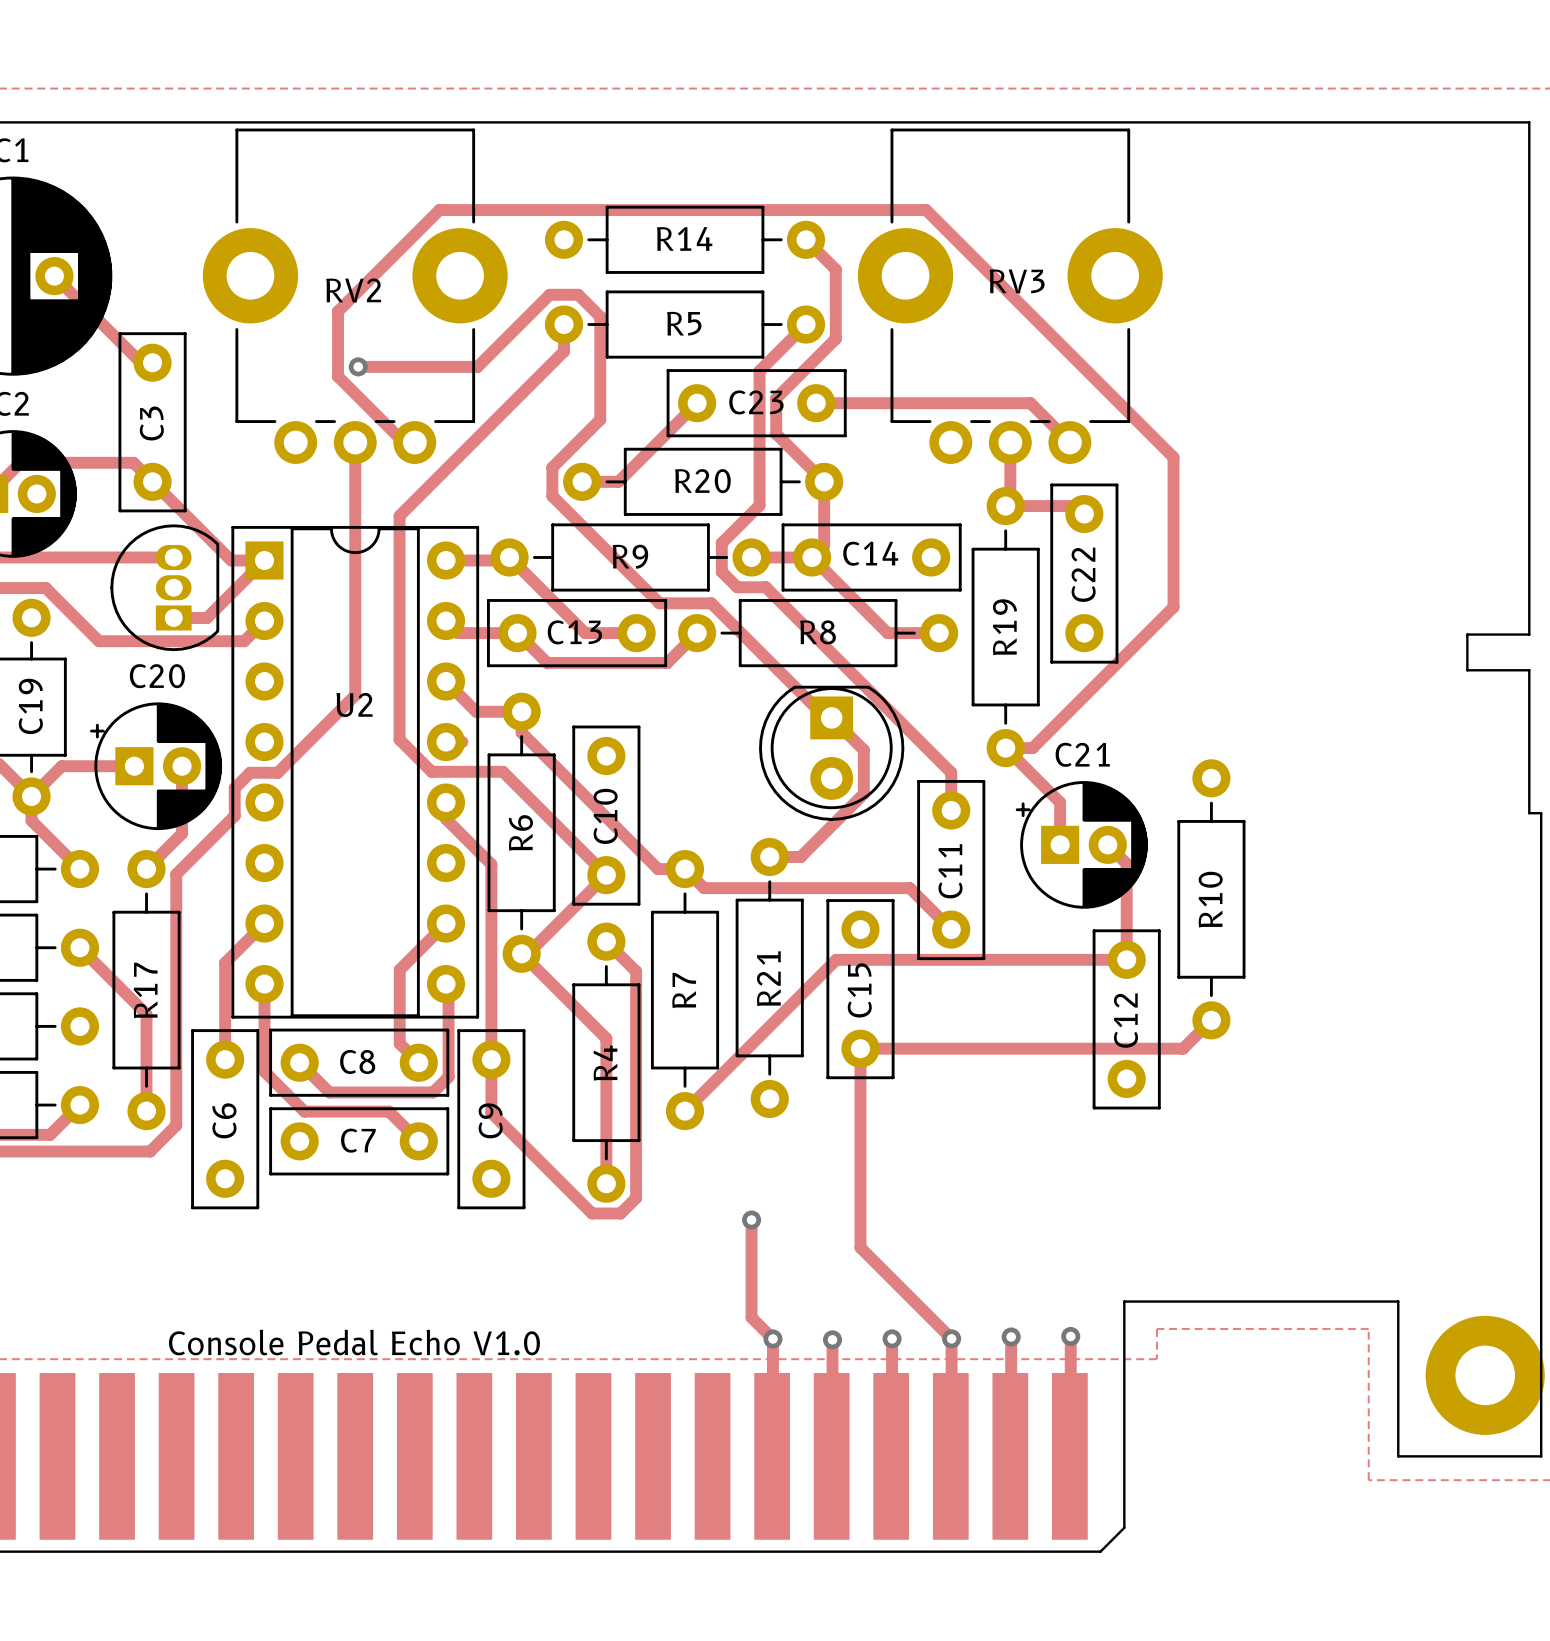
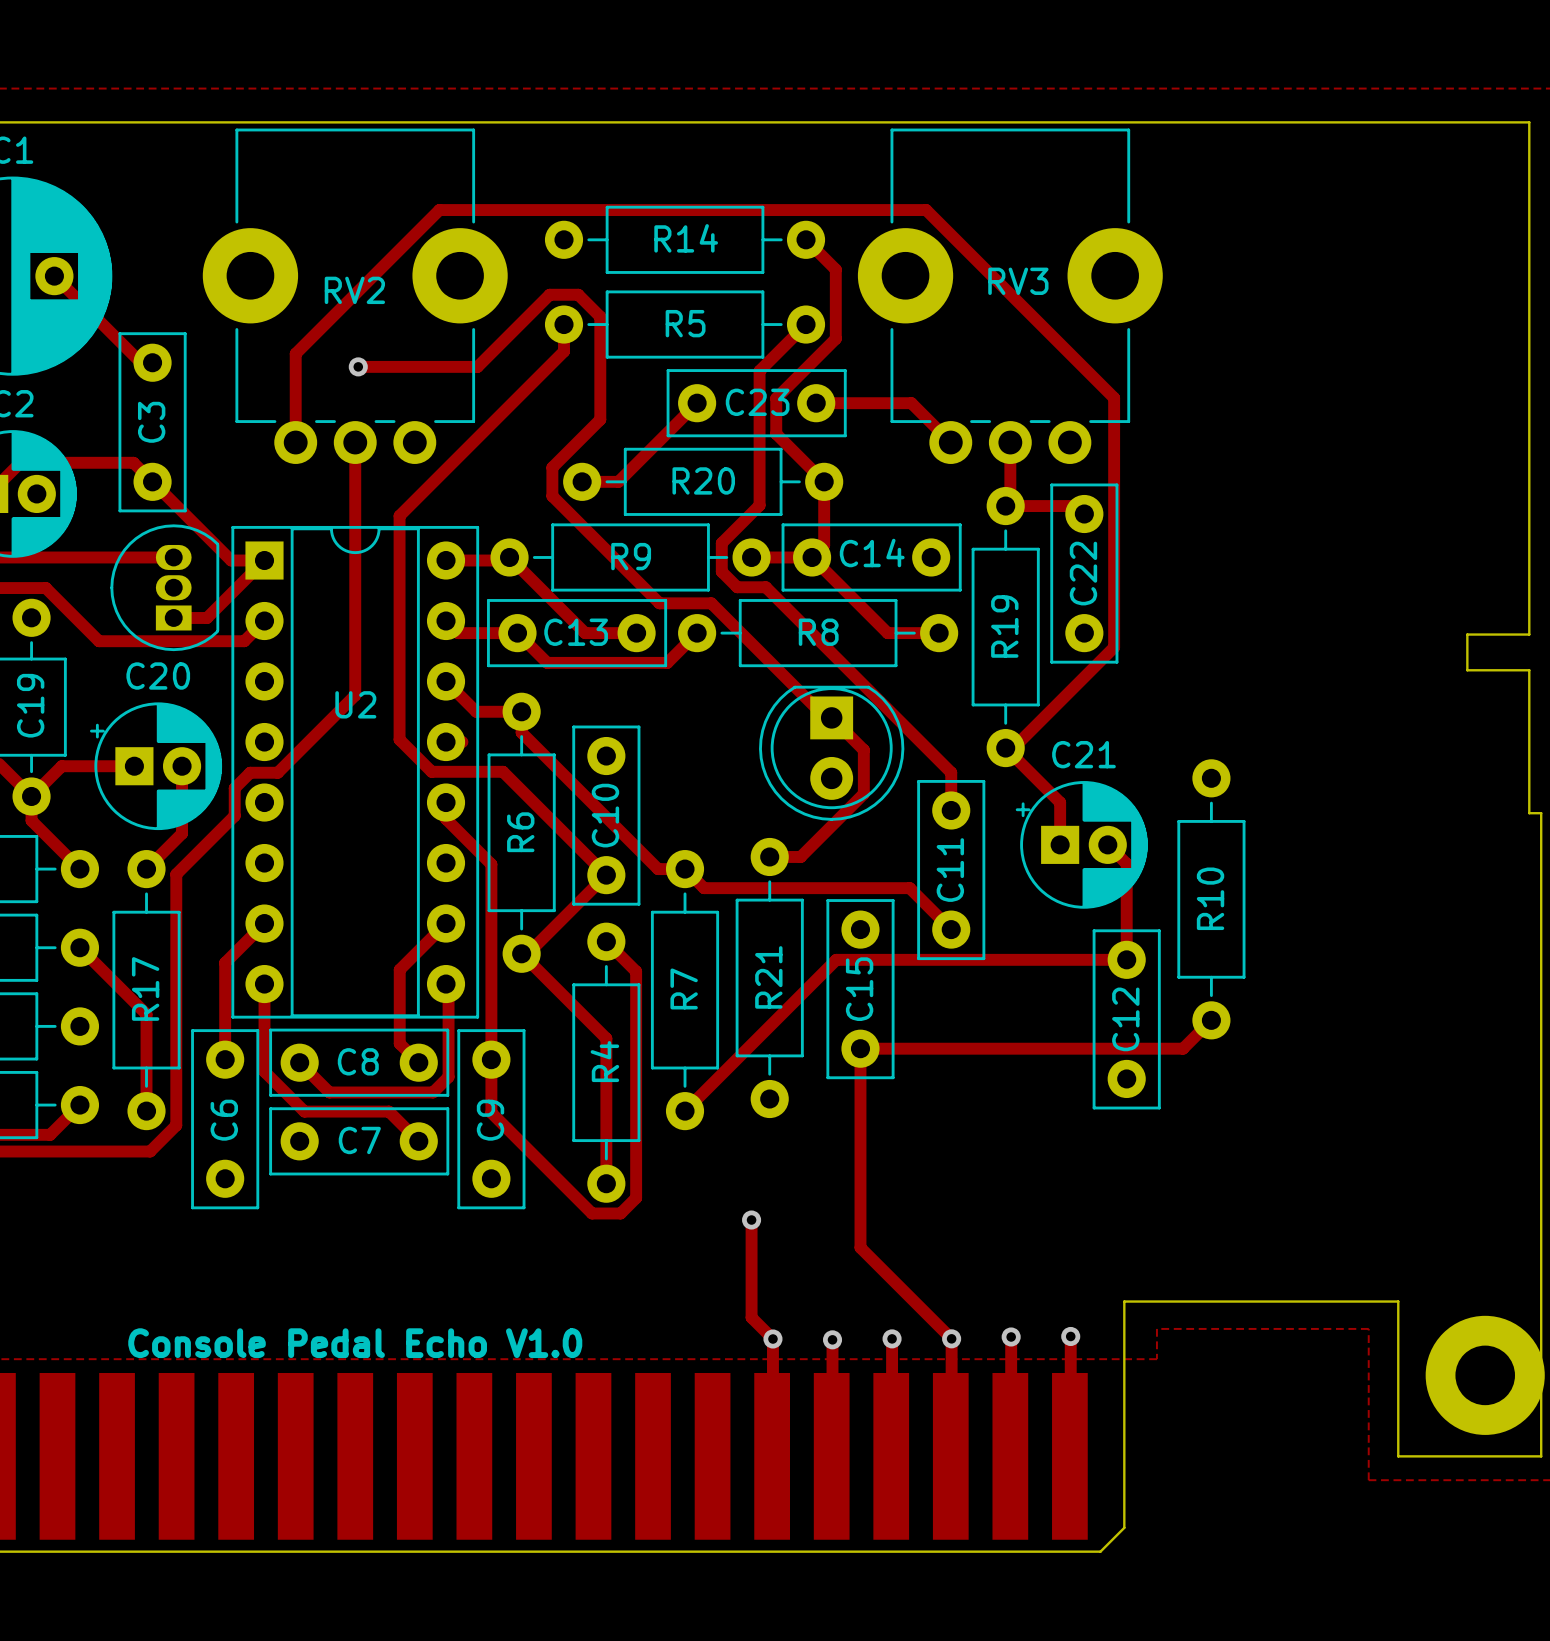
track: (338, 311) (338, 376) (403, 442) (414, 442) -> (338, 311) (295, 353) (295, 442)
track: (1114, 398) (1173, 457) (1173, 607) (1032, 748) (1013, 748) -> (1114, 398) (1114, 647) (1013, 748)
track: (911, 403) (1030, 403) (1069, 442) -> (911, 403) (950, 442)

